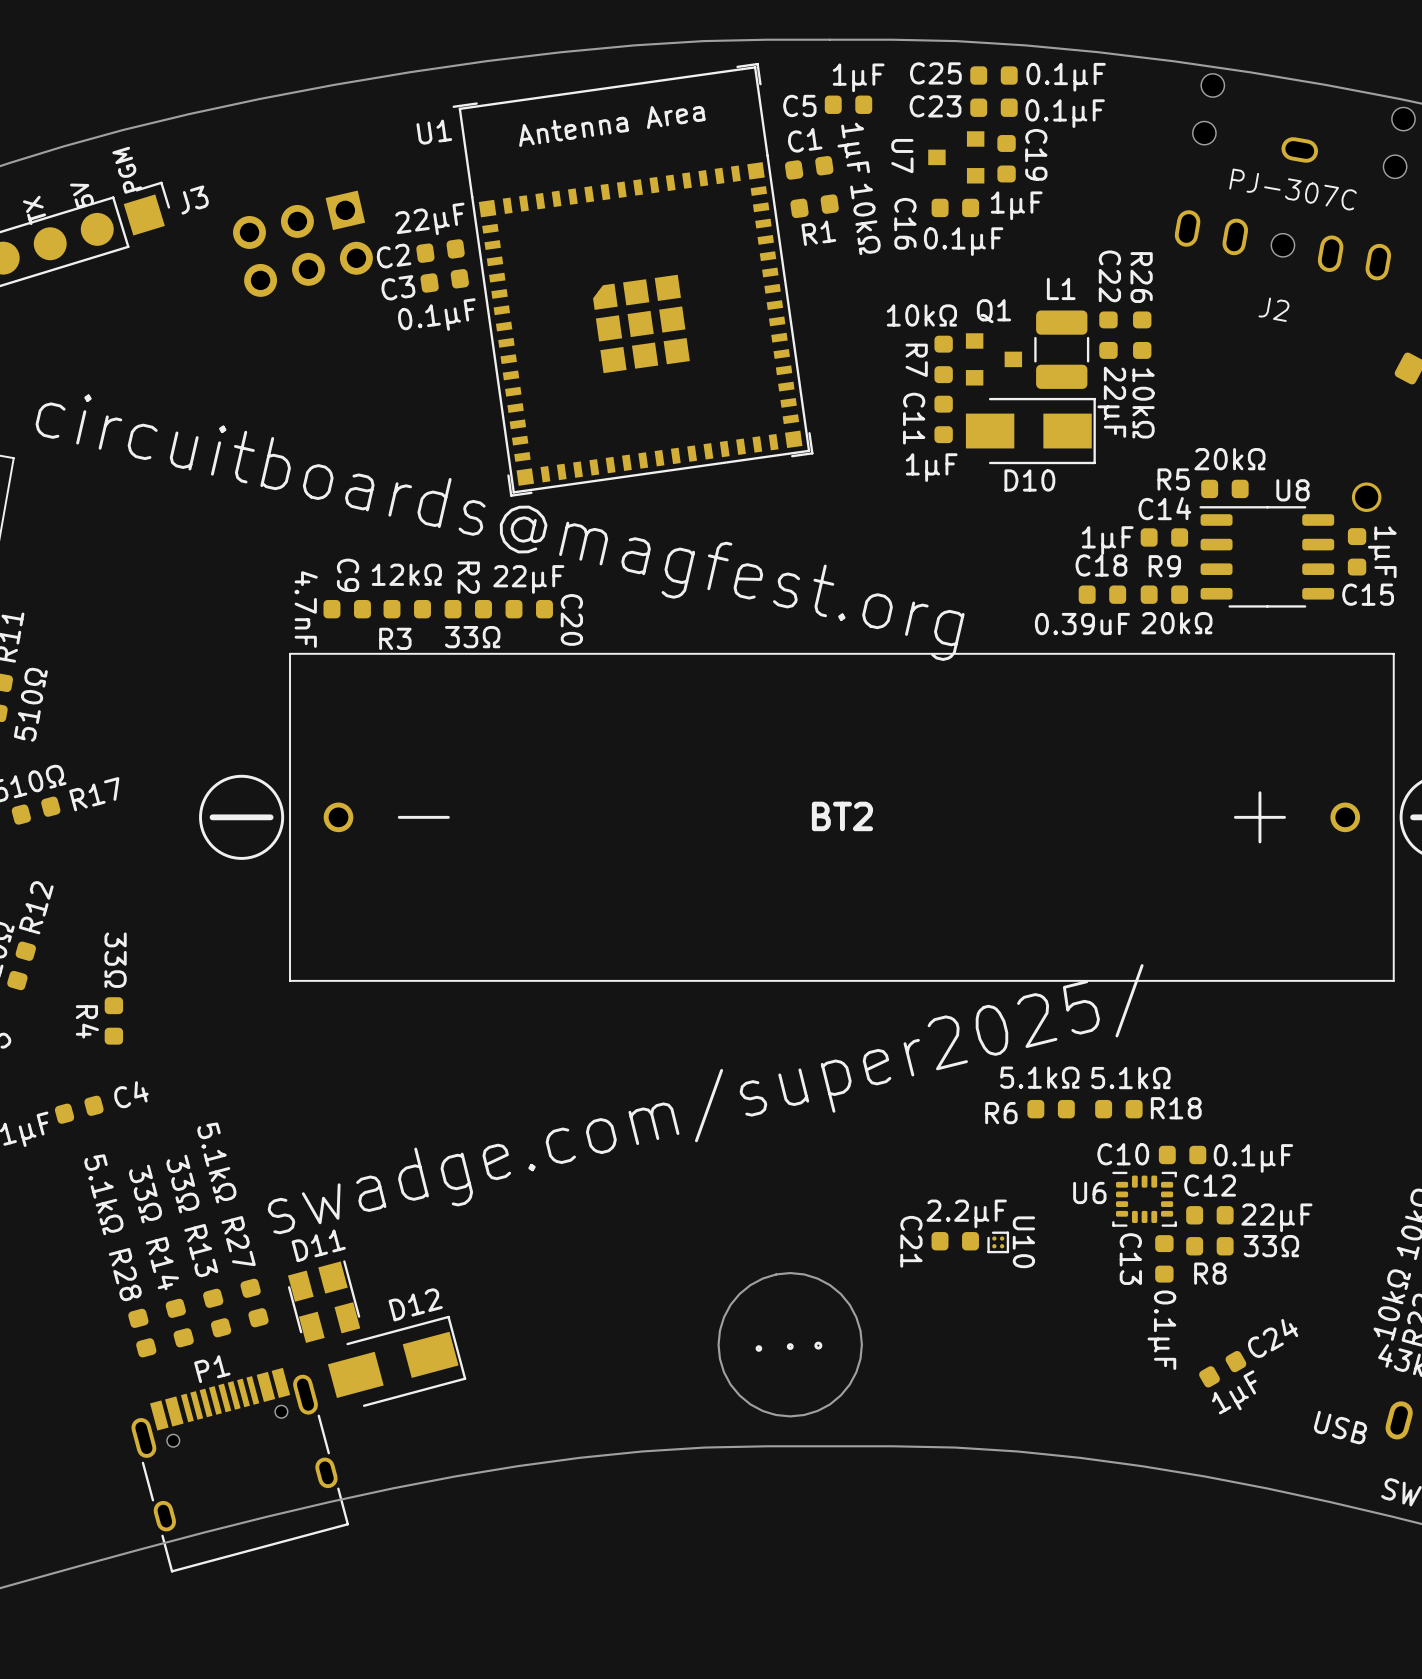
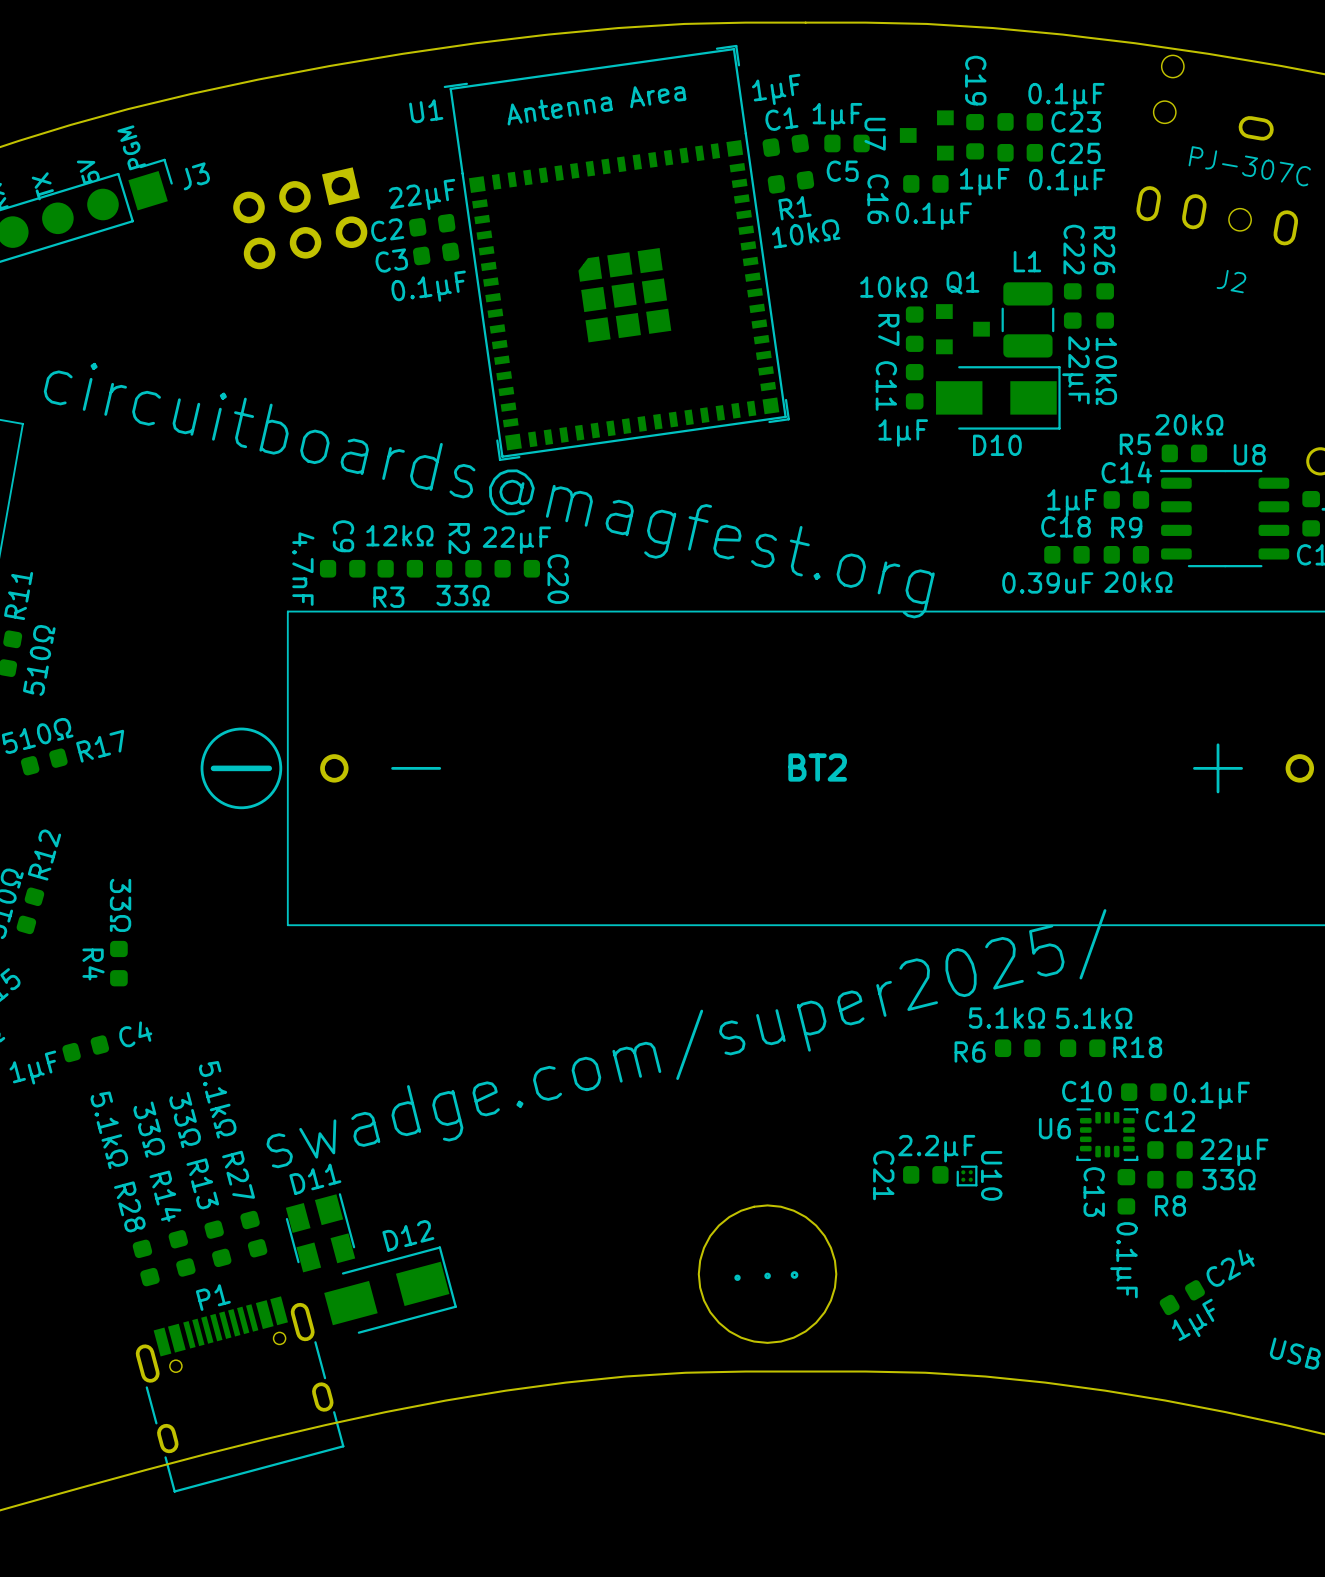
C25 name position: C25 (935, 73) -> C25 (1075, 153)
C25 position: (993, 75) -> (1020, 152)
C5 value position: 1μF (858, 77) -> 1μF (837, 116)
C25 value position: 0.1μF (1066, 77) -> 0.1μF (1067, 182)
C5 position: (848, 104) -> (847, 143)
C5 name position: C5 (799, 105) -> C5 (842, 171)
C23 name position: C23 (935, 106) -> C23 (1076, 121)
C23 position: (993, 107) -> (1020, 121)
C23 value position: 0.1μF (1065, 113) -> 0.1μF (1066, 96)
C1 value rotation: 0° (853, 147) -> 90° counterclockwise (776, 89)
C19 name position: C19 (1036, 154) -> C19 (975, 80)
R1 value rotation: 0° (865, 219) -> 90° counterclockwise (806, 233)

